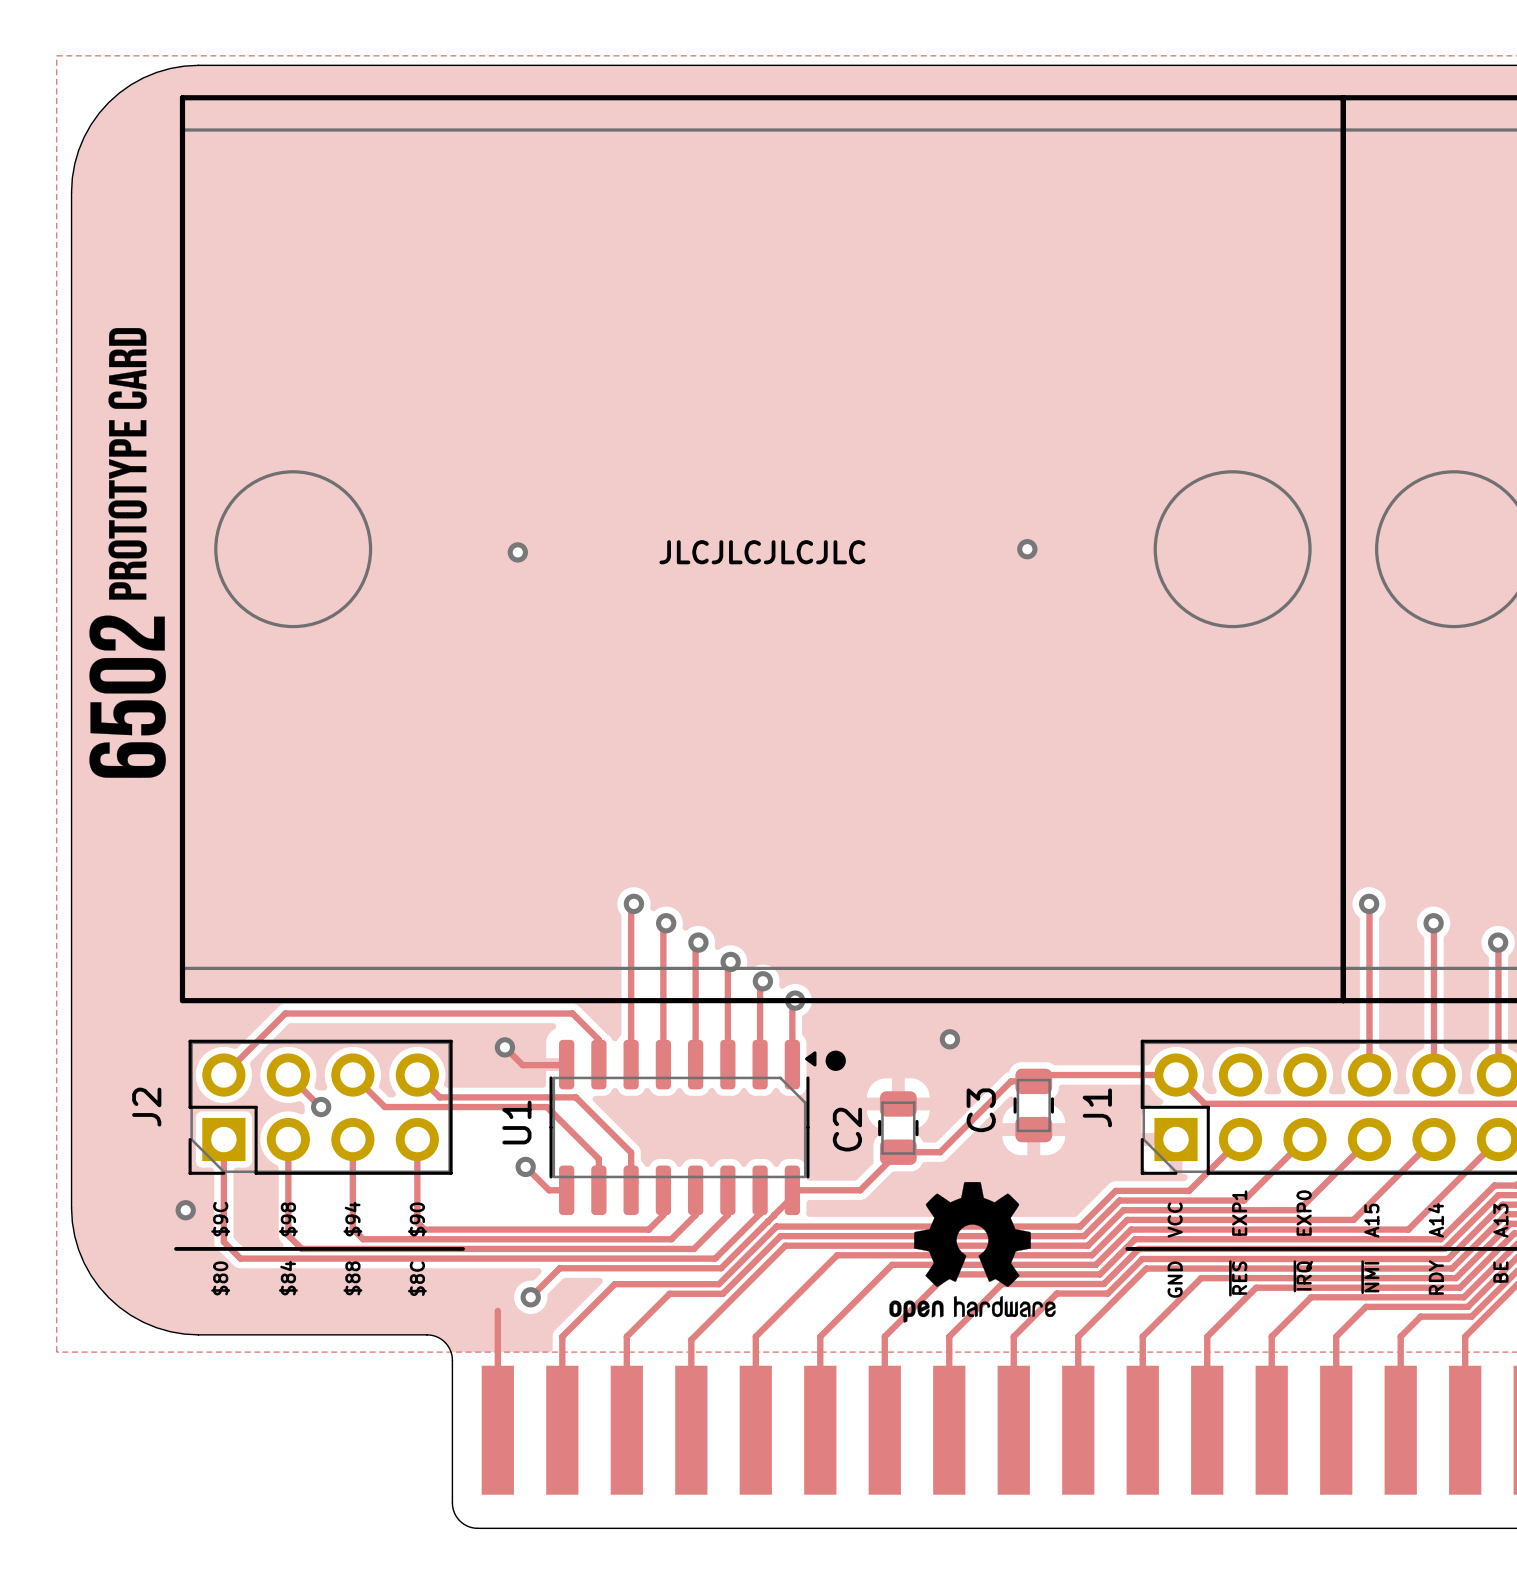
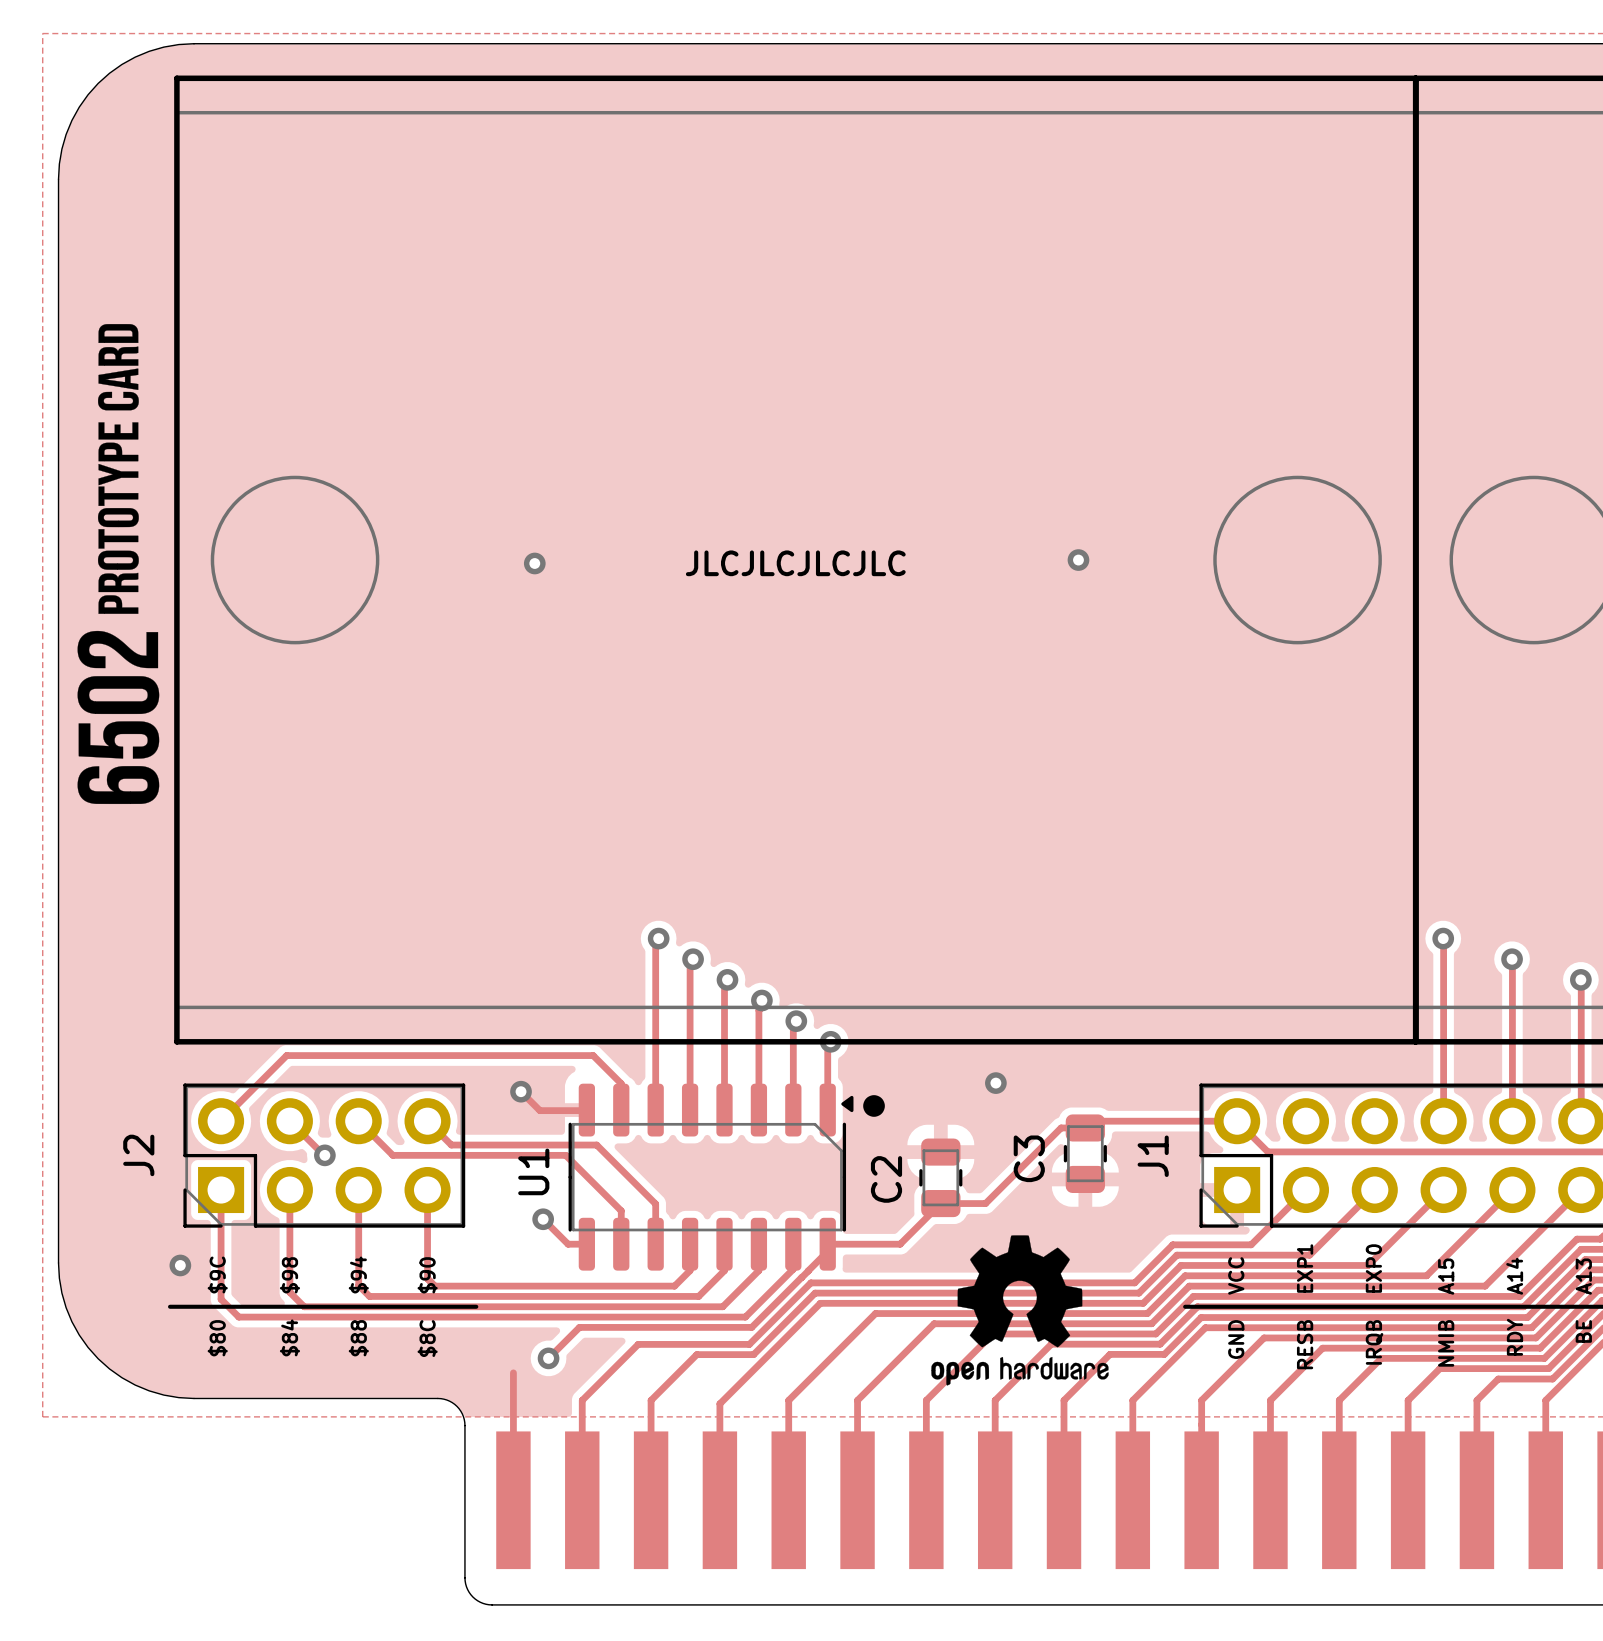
text: ~{IRQ} (1303, 1276) -> IRQB (1374, 1342)
text: ~{NMI} (1370, 1277) -> NMIB (1446, 1343)
text: ~{RES} (1238, 1278) -> RESB (1305, 1344)

